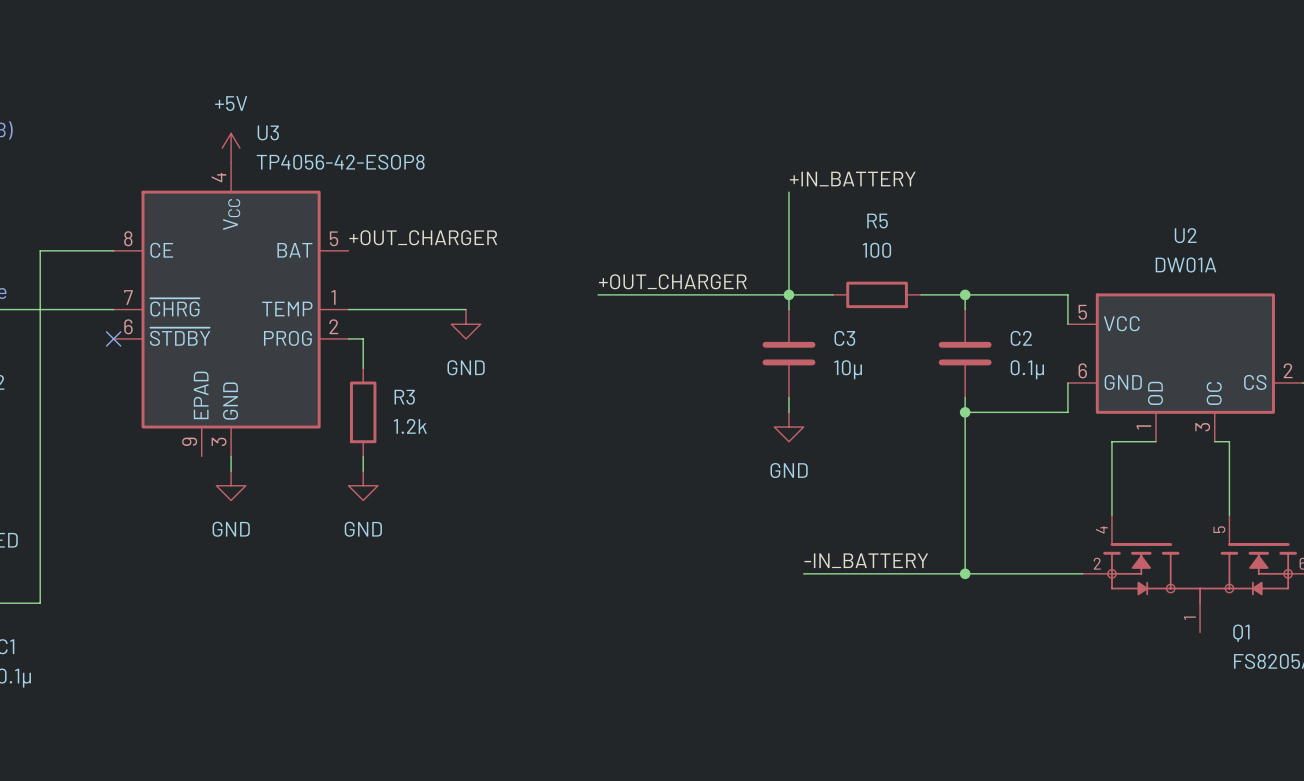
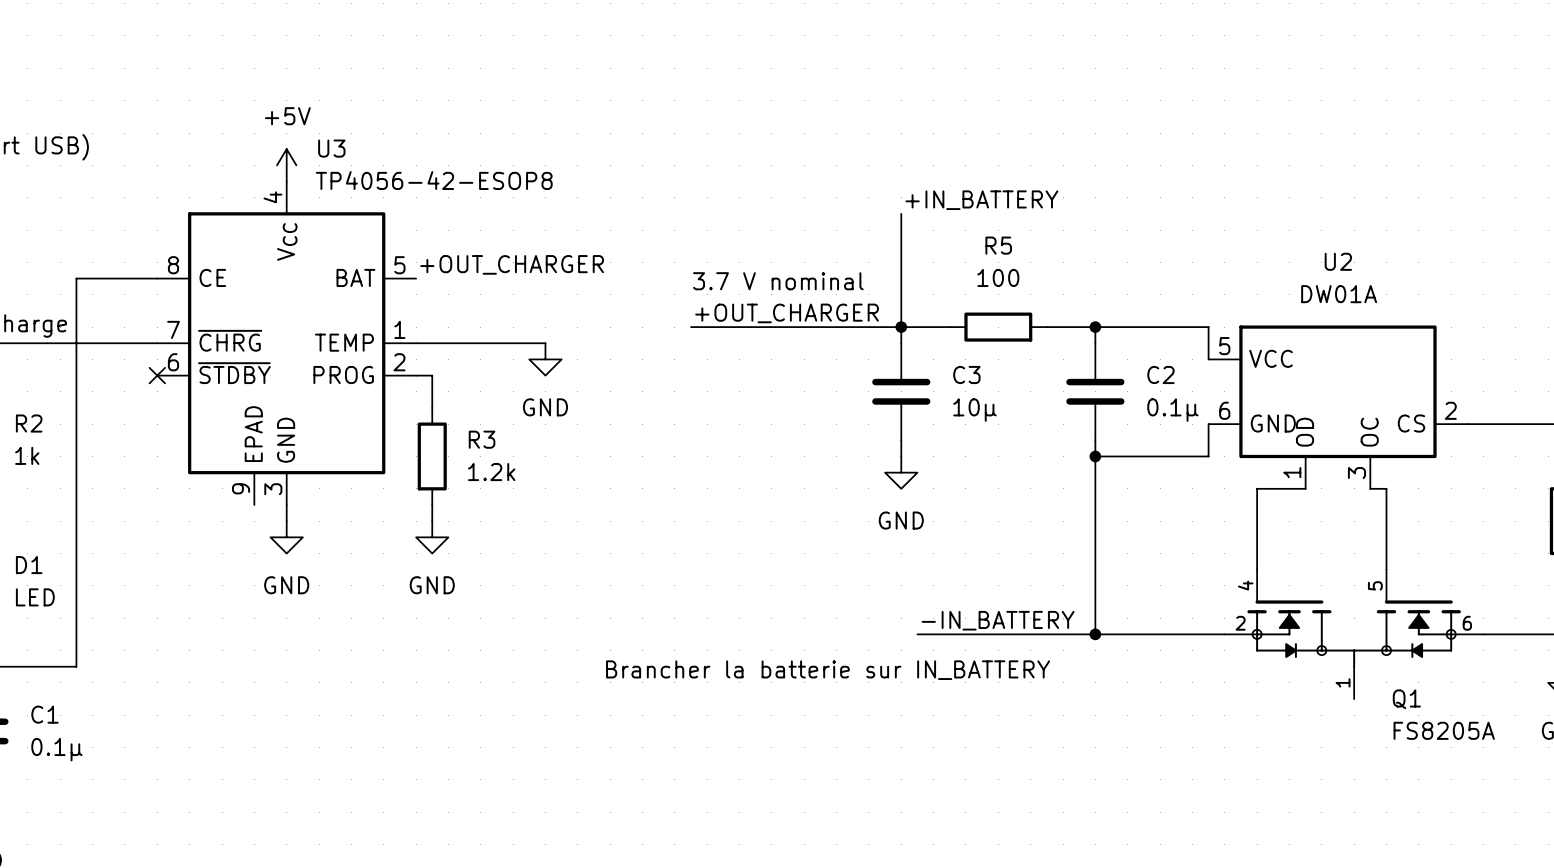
text: none -> 3.7 V nominal (778, 281)
text: none -> Brancher la batterie sur IN_BATTERY (828, 670)

